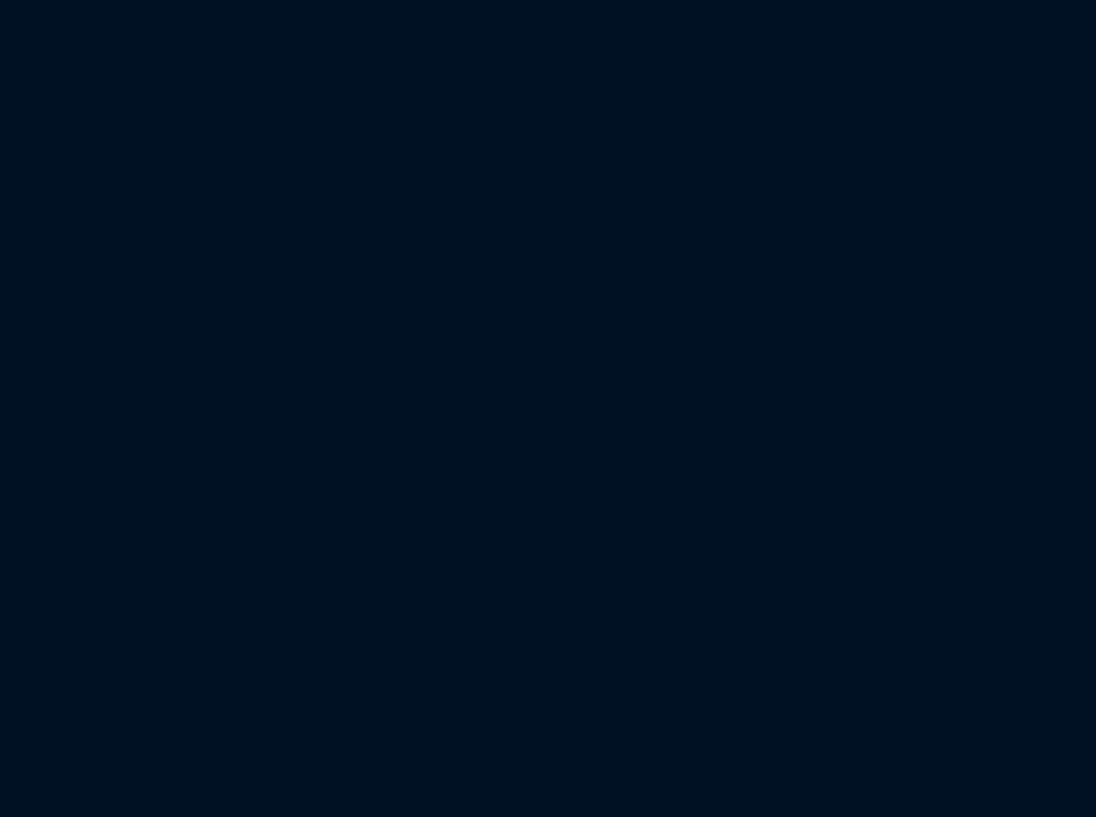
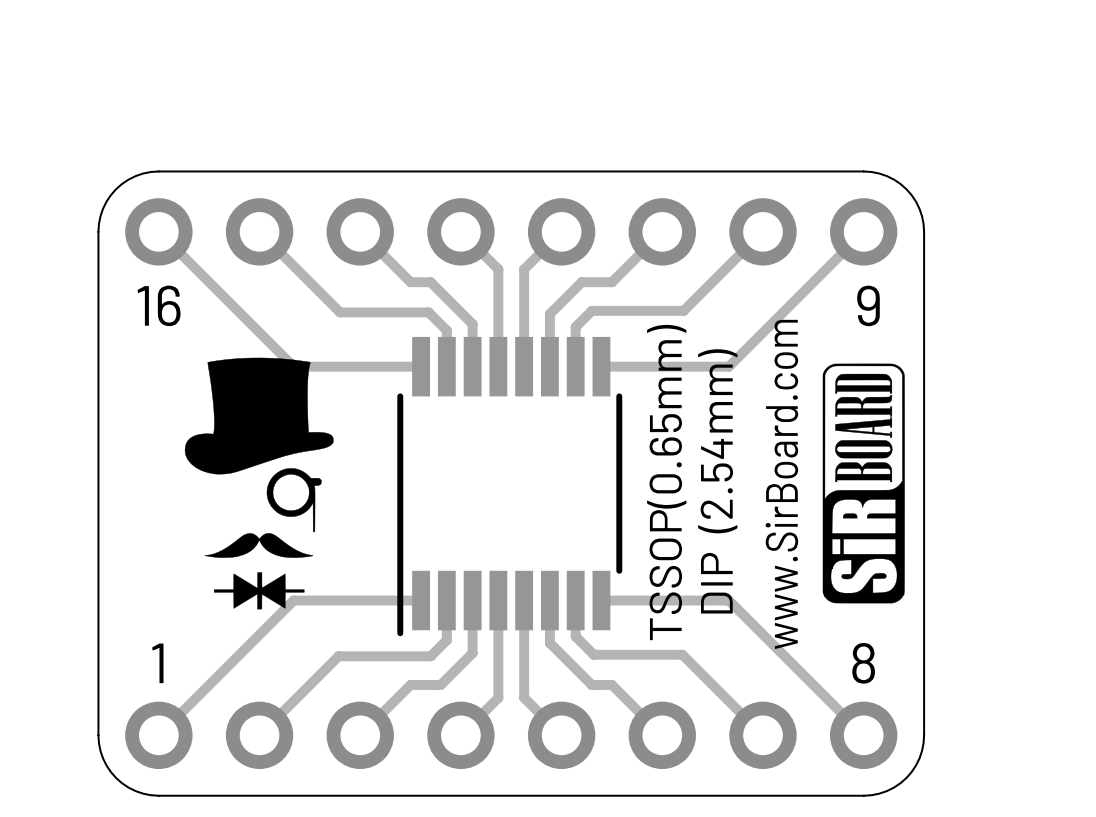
board edge: none -> (863, 171) (158, 171) (143, 173) (122, 183) (110, 195) (103, 208) (98, 231) (98, 735) (100, 750) (110, 772) (122, 783) (135, 791) (158, 795) (863, 795) (879, 793) (900, 783) (911, 772) (919, 758) (924, 735) (924, 231) (919, 208) (906, 189) (886, 176) (863, 171)
track: none -> (158, 231) (293, 366) (421, 366)
track: none -> (259, 231) (340, 312) (428, 312) (446, 330) (446, 366)
track: none -> (360, 231) (410, 282) (430, 282) (472, 324) (472, 366)
track: none -> (460, 231) (498, 269) (498, 366)
part: none -> (511, 231)
track: none -> (561, 231) (524, 269) (524, 366)
track: none -> (662, 231) (611, 282) (581, 282) (549, 314) (549, 366)
track: none -> (762, 231) (683, 310) (591, 310) (575, 327) (575, 366)
track: none -> (863, 231) (728, 366) (601, 366)
text: none -> 16 (159, 305)
text: none -> 9 (868, 305)
drawing: none -> [184, 357, 334, 610]
drawing: none -> [822, 363, 905, 604]
text: none -> DIP (2.54mm) (717, 481)
text: none -> TSSOP(0.65mm) (666, 482)
text: none -> www.SirBoard.com (781, 484)
part: none -> (509, 486)
track: none -> (421, 600) (293, 600) (158, 735)
track: none -> (446, 600) (446, 640) (430, 656) (338, 656) (259, 735)
track: none -> (472, 600) (472, 653) (440, 684) (410, 684) (360, 735)
track: none -> (498, 600) (498, 697) (460, 735)
track: none -> (524, 600) (524, 697) (561, 735)
track: none -> (549, 600) (549, 643) (591, 684) (611, 684) (662, 735)
track: none -> (575, 600) (575, 636) (593, 654) (682, 654) (762, 735)
track: none -> (601, 600) (728, 600) (863, 735)
text: none -> 1 (157, 663)
text: none -> 8 (863, 663)
part: none -> (511, 735)

